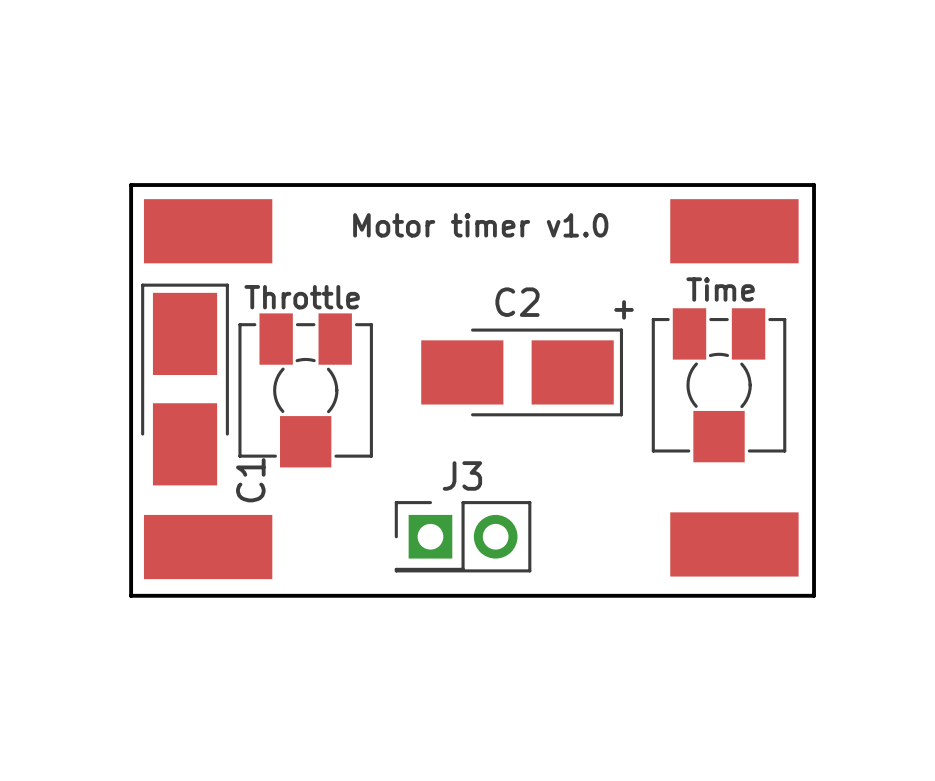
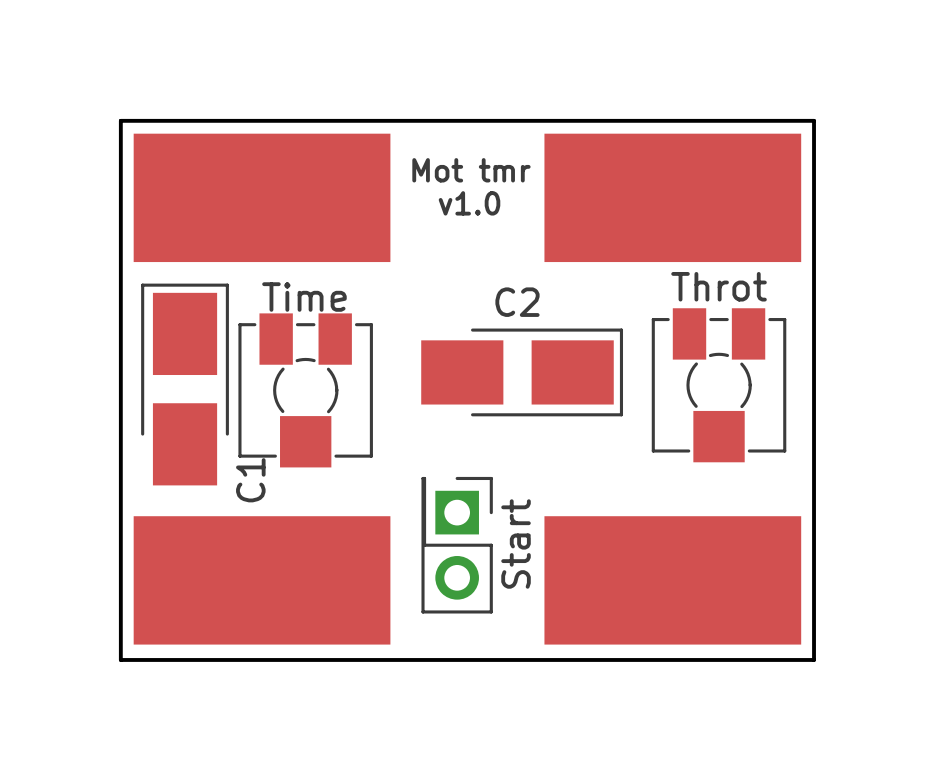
text: none -> Mot tmr (471, 170)
board edge: (814, 185) (131, 185) (131, 595) (814, 595) -> (814, 185) (814, 120) (120, 120) (120, 659) (814, 659) (814, 595)
part: none -> (262, 197)
part: none -> (672, 197)
text: Motor timer v1.0 (480, 225) -> v1.0 (469, 203)
part: (208, 231) -> none
part: (734, 231) -> none
Throt name: none -> Throt (719, 286)
text: Time (720, 289) -> none
text: Throttle (302, 297) -> none
Time name: none -> Time (304, 297)
text: + (624, 309) -> none
J3: (463, 536) -> none
part: (734, 544) -> none
Start: none -> (457, 545)
part: (208, 547) -> none
part: none -> (262, 580)
part: none -> (672, 580)

